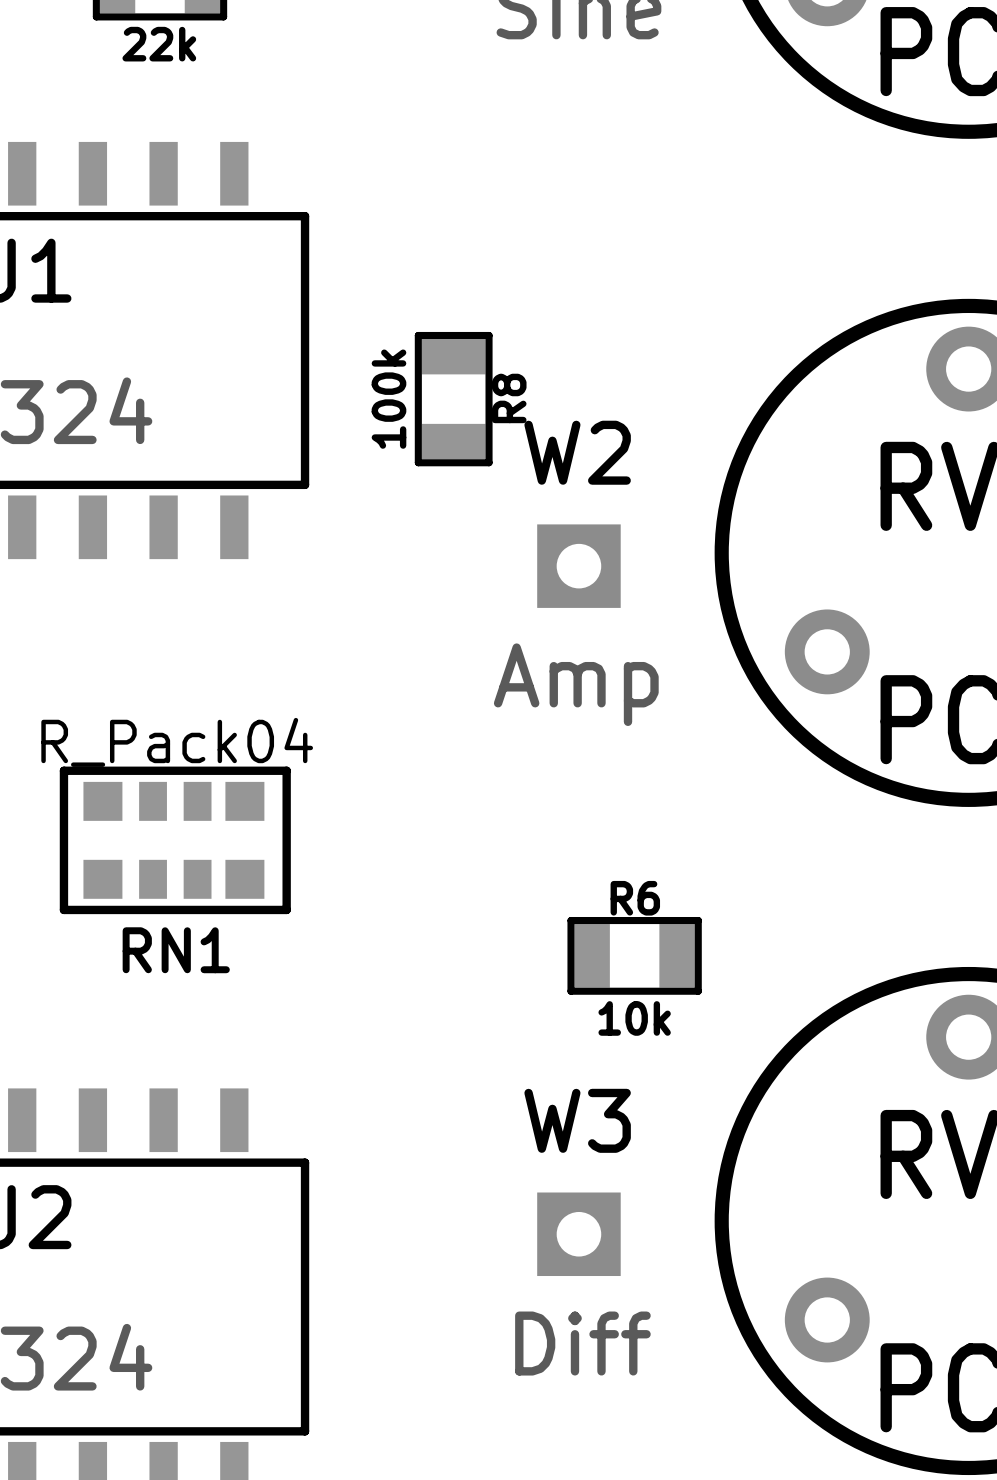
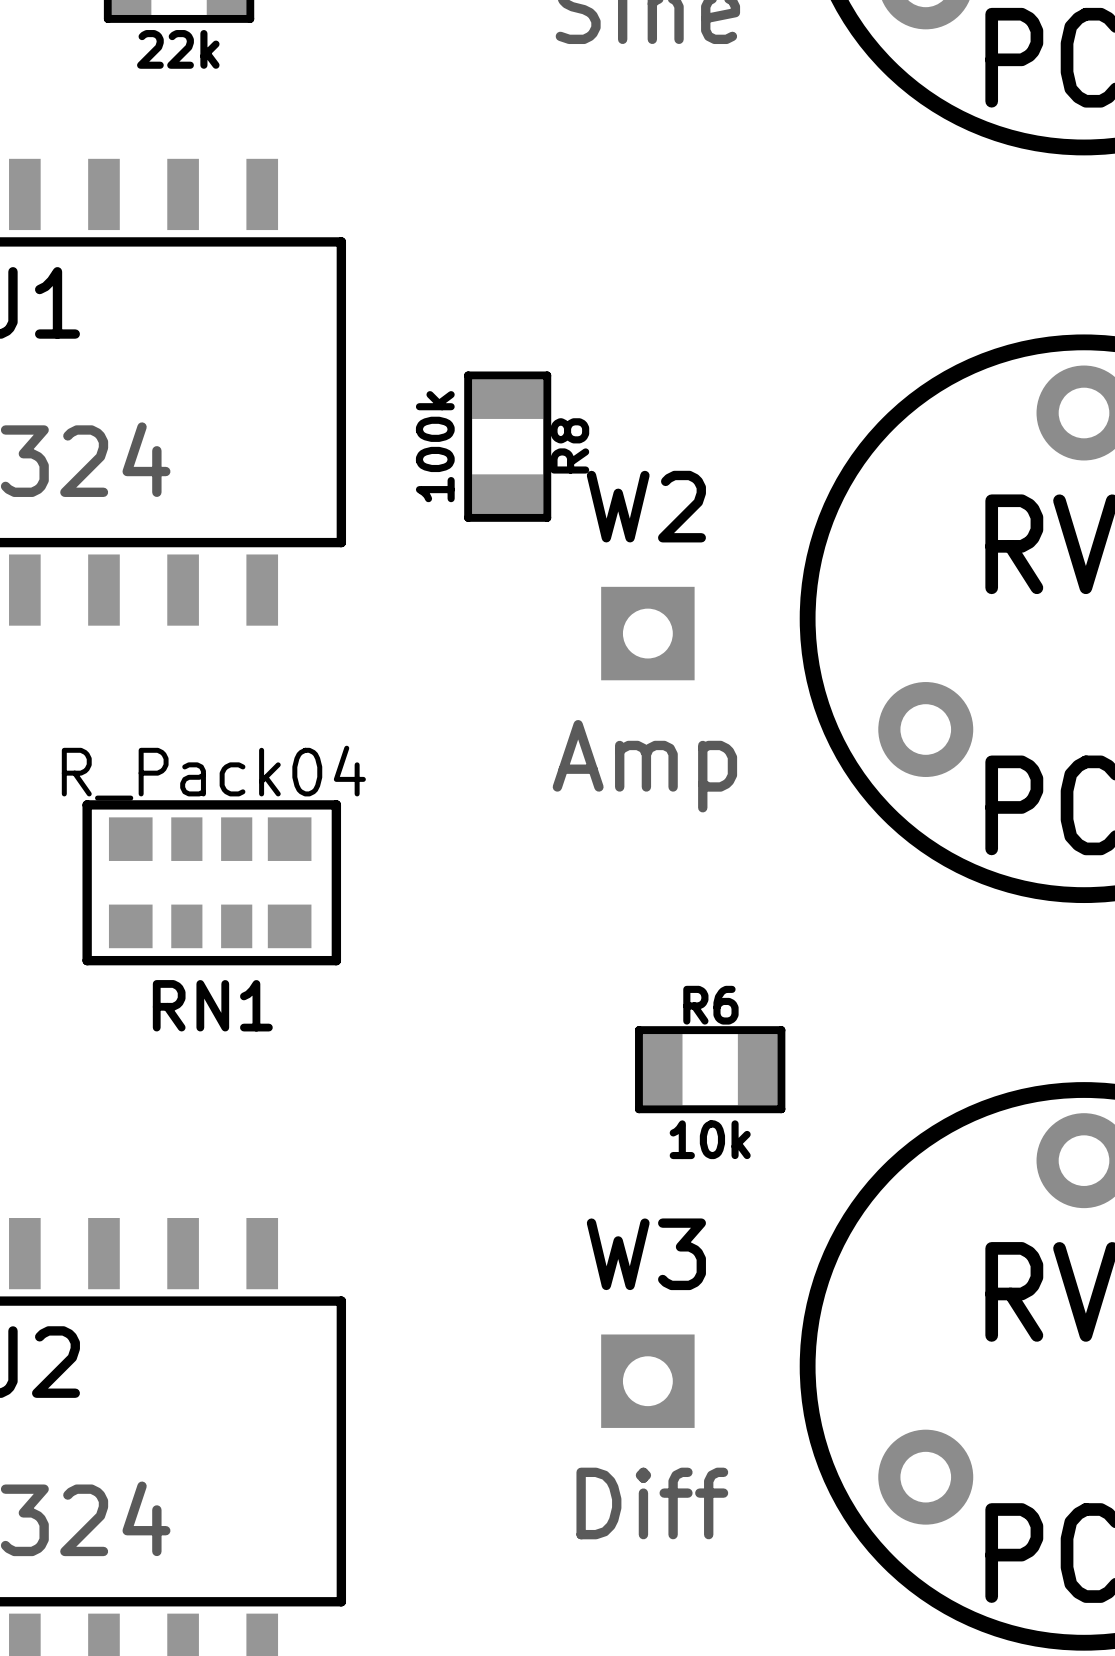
RN1 position: (175, 840) -> (211, 882)

